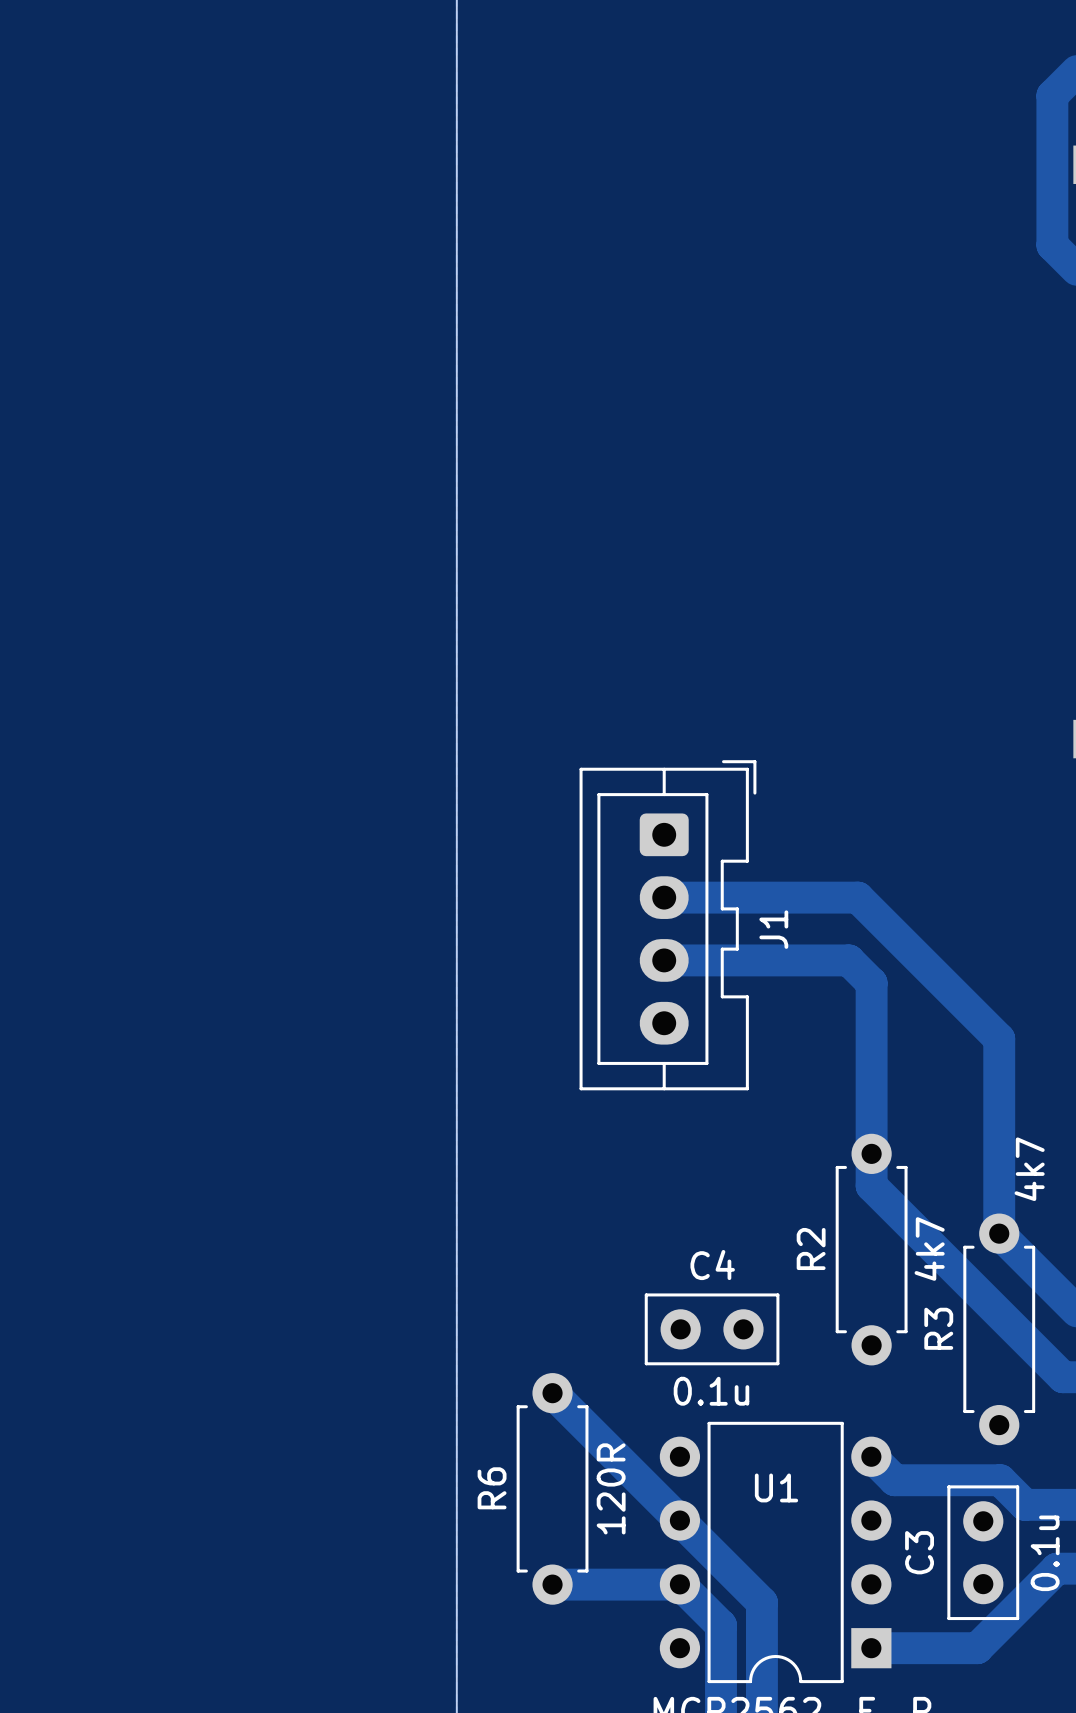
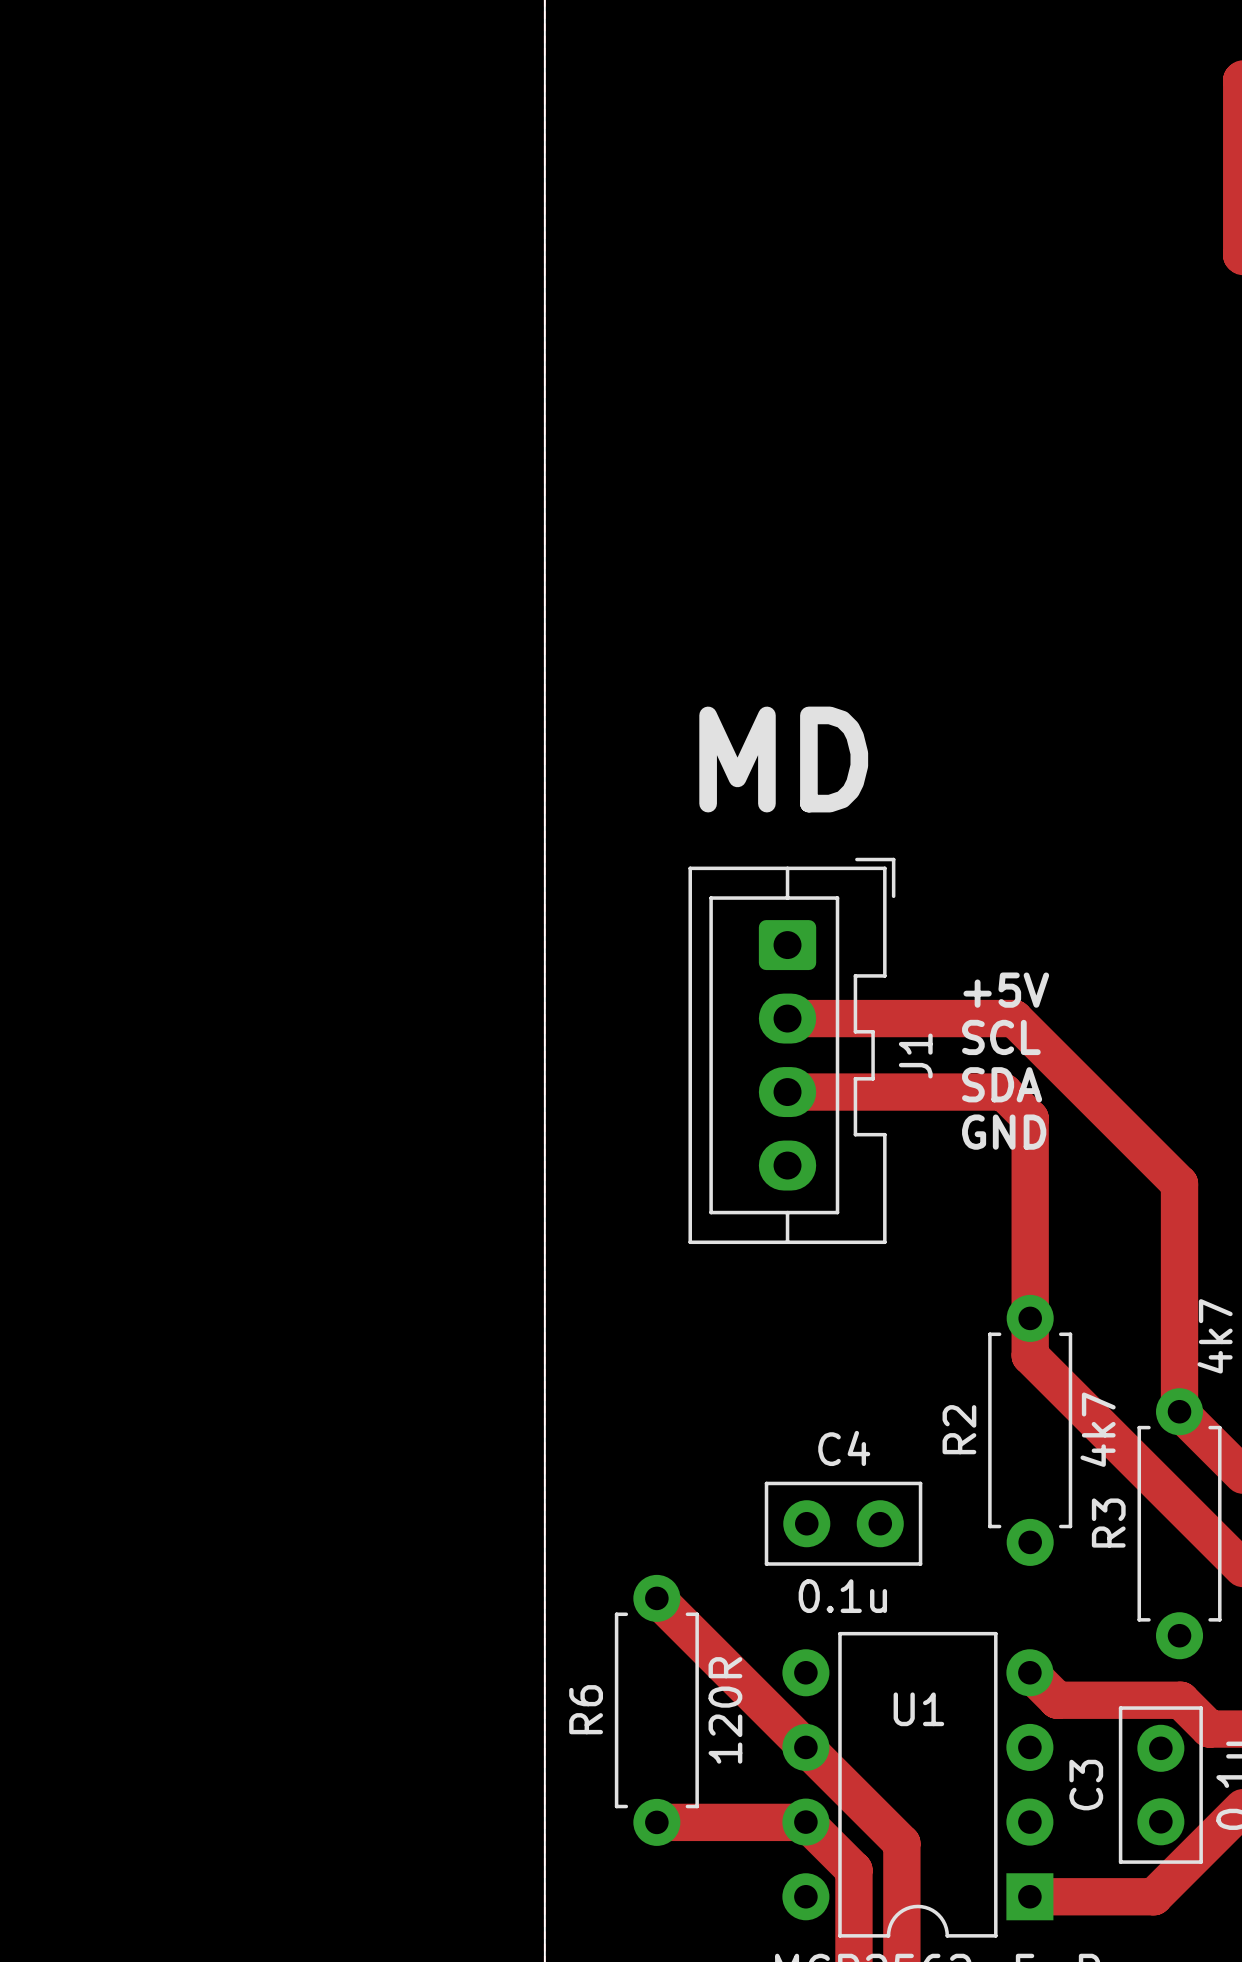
text: none -> MD (783, 759)
text: none -> +5V (1006, 990)
text: none -> SCL (1001, 1037)
text: none -> SDA (1002, 1084)
text: none -> GND (1004, 1132)

